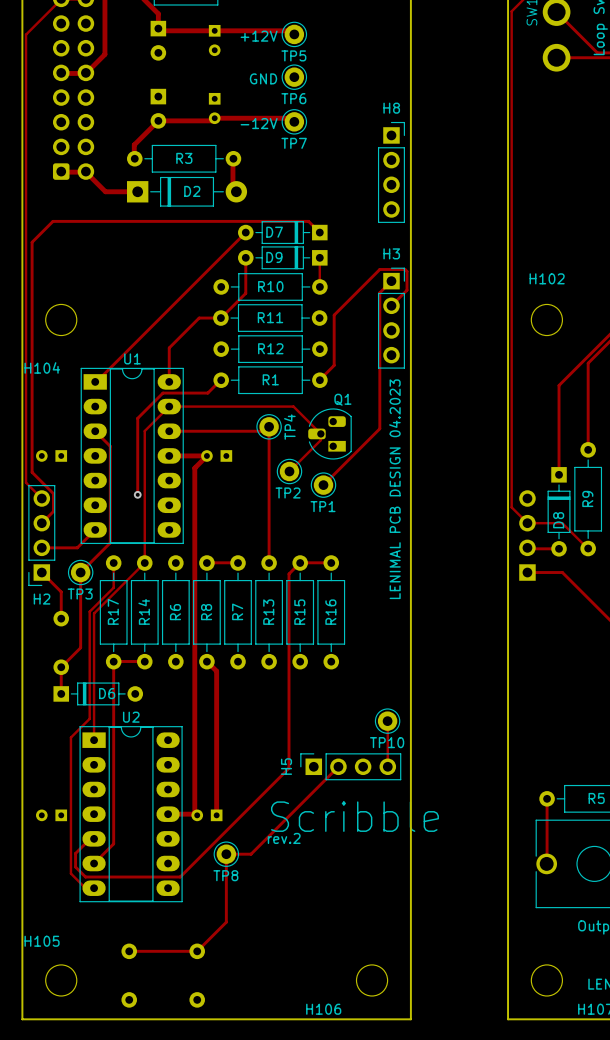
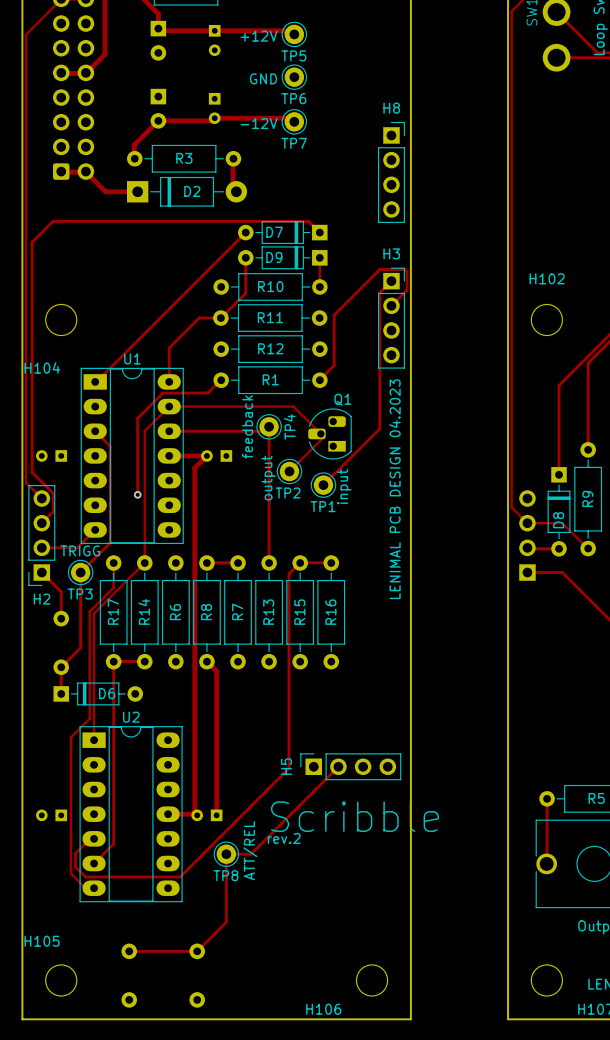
text: none -> feedback (247, 426)
text: none -> output (268, 478)
text: none -> input (344, 486)
text: none -> TRIGG (80, 550)
TP10: (387, 721) -> none
track: (390, 722) (387, 724) (387, 766) -> none
text: none -> ATT/REL (250, 850)

